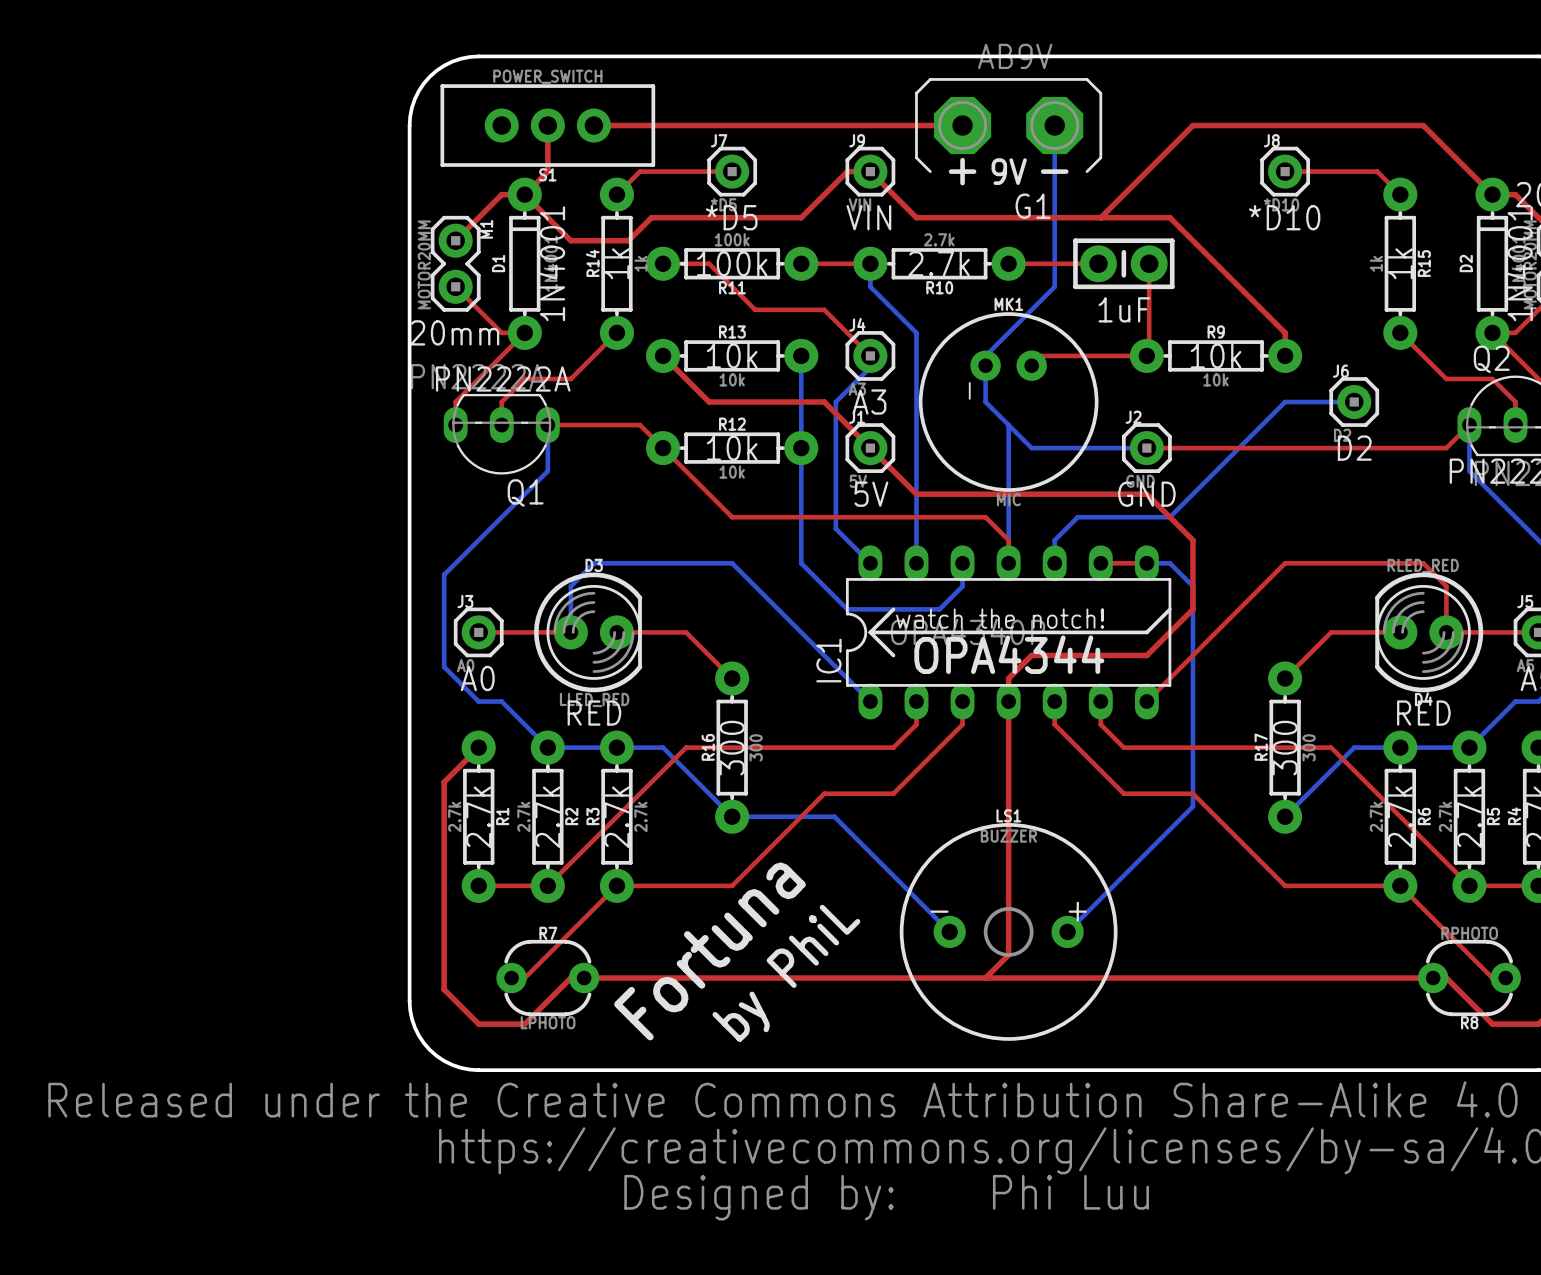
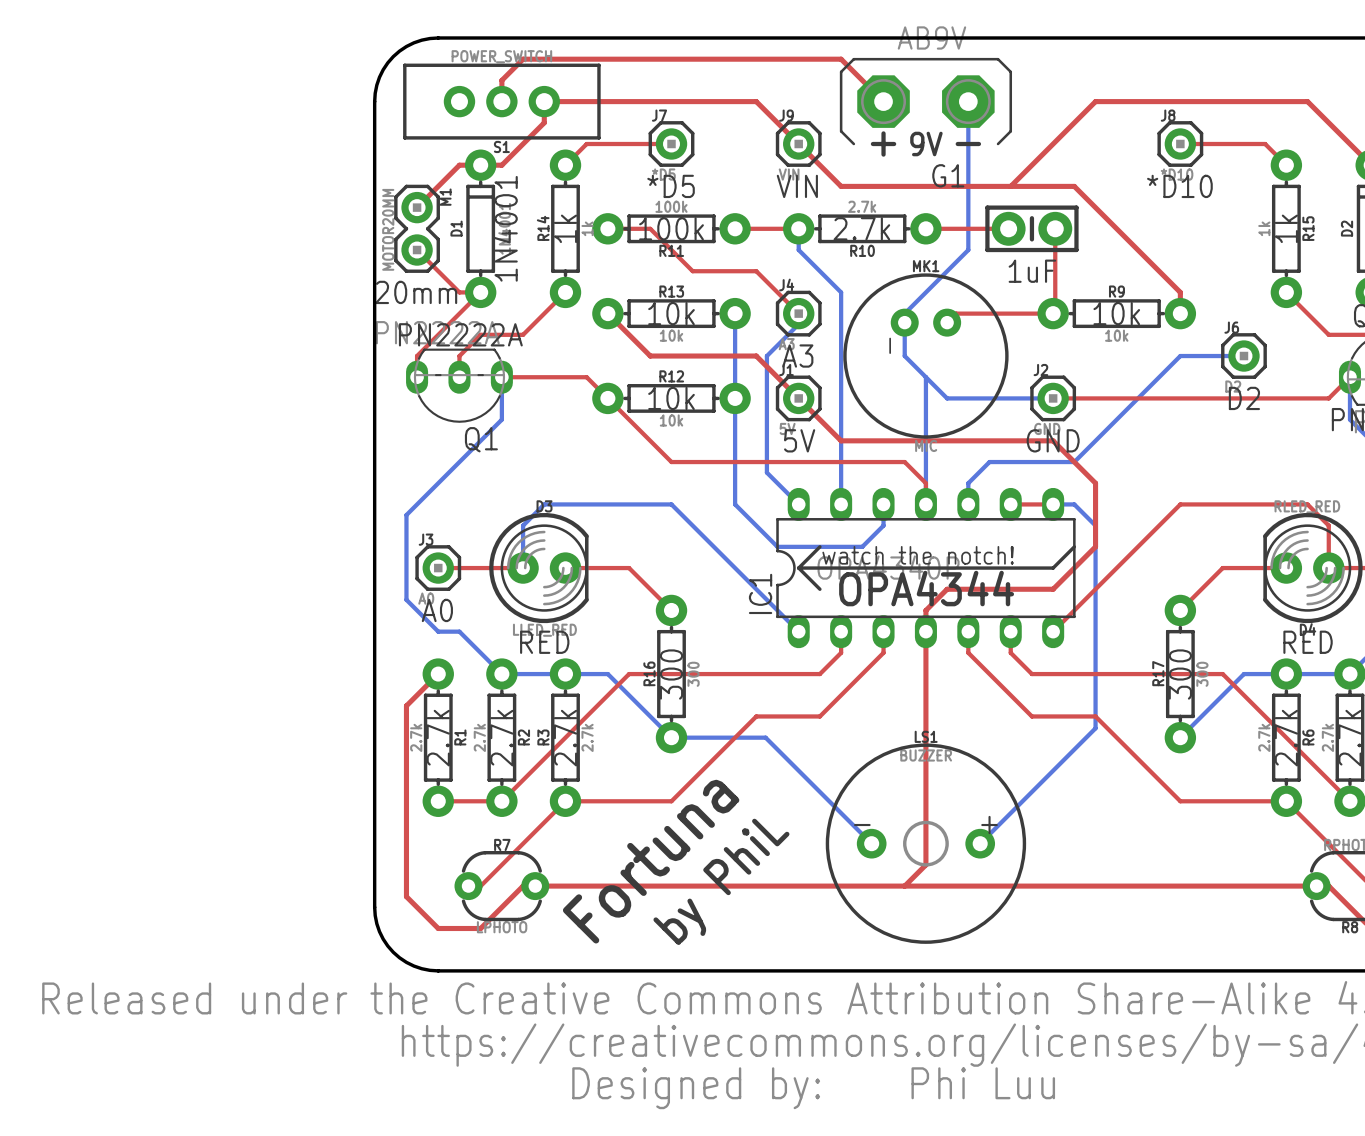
top track: (547, 125) (547, 171) (524, 194) (570, 240) (628, 240) (651, 217) (801, 217) (847, 171) (870, 171) -> (501, 101) (501, 80) (523, 59) (841, 59) (883, 101)
top track: none -> (544, 101) (544, 122) (501, 165) (480, 165)
top track: (824, 125) (962, 125) -> (756, 101) (798, 144)

